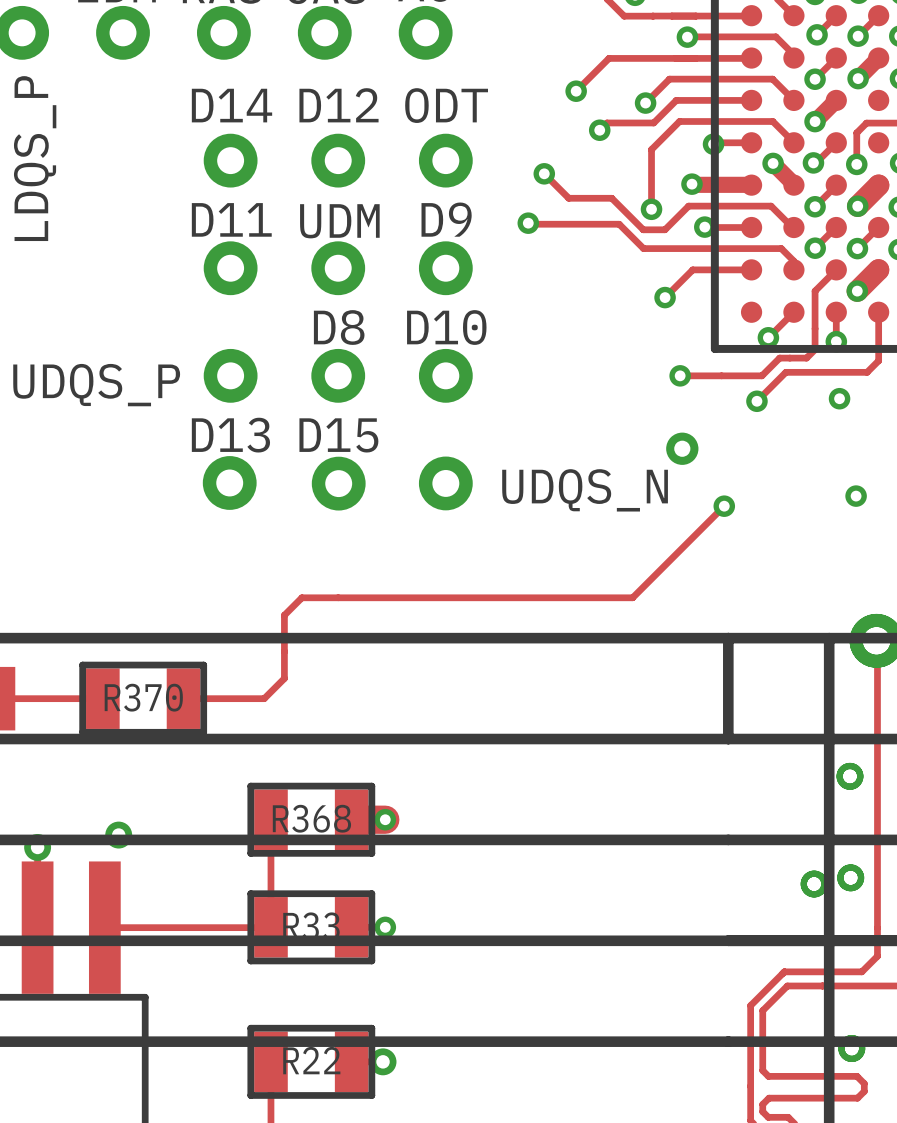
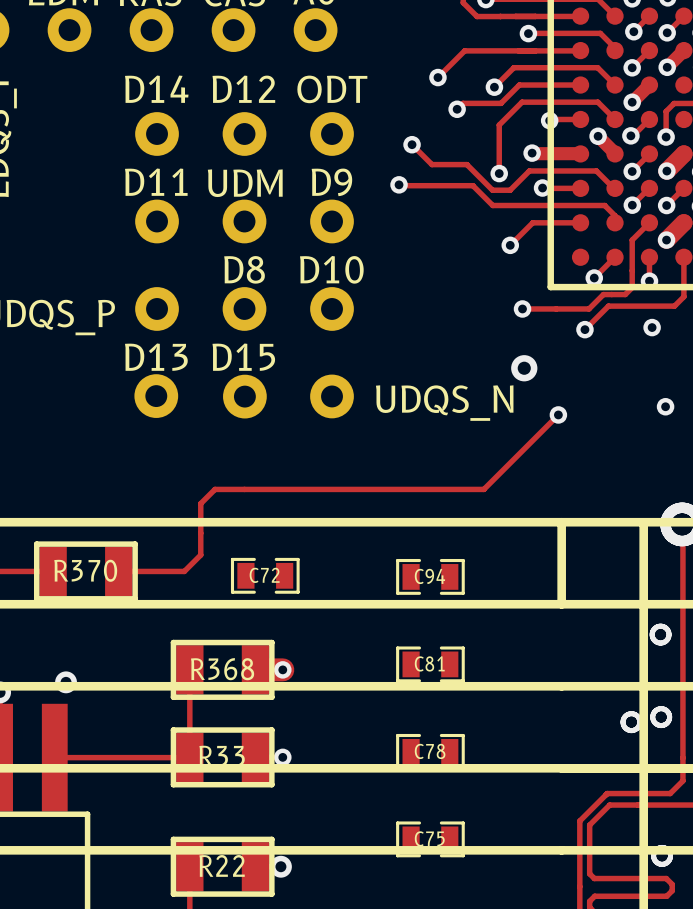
C72: none -> (265, 575)
C94: none -> (430, 576)
C81: none -> (430, 664)
C78: none -> (430, 751)
C75: none -> (430, 839)

